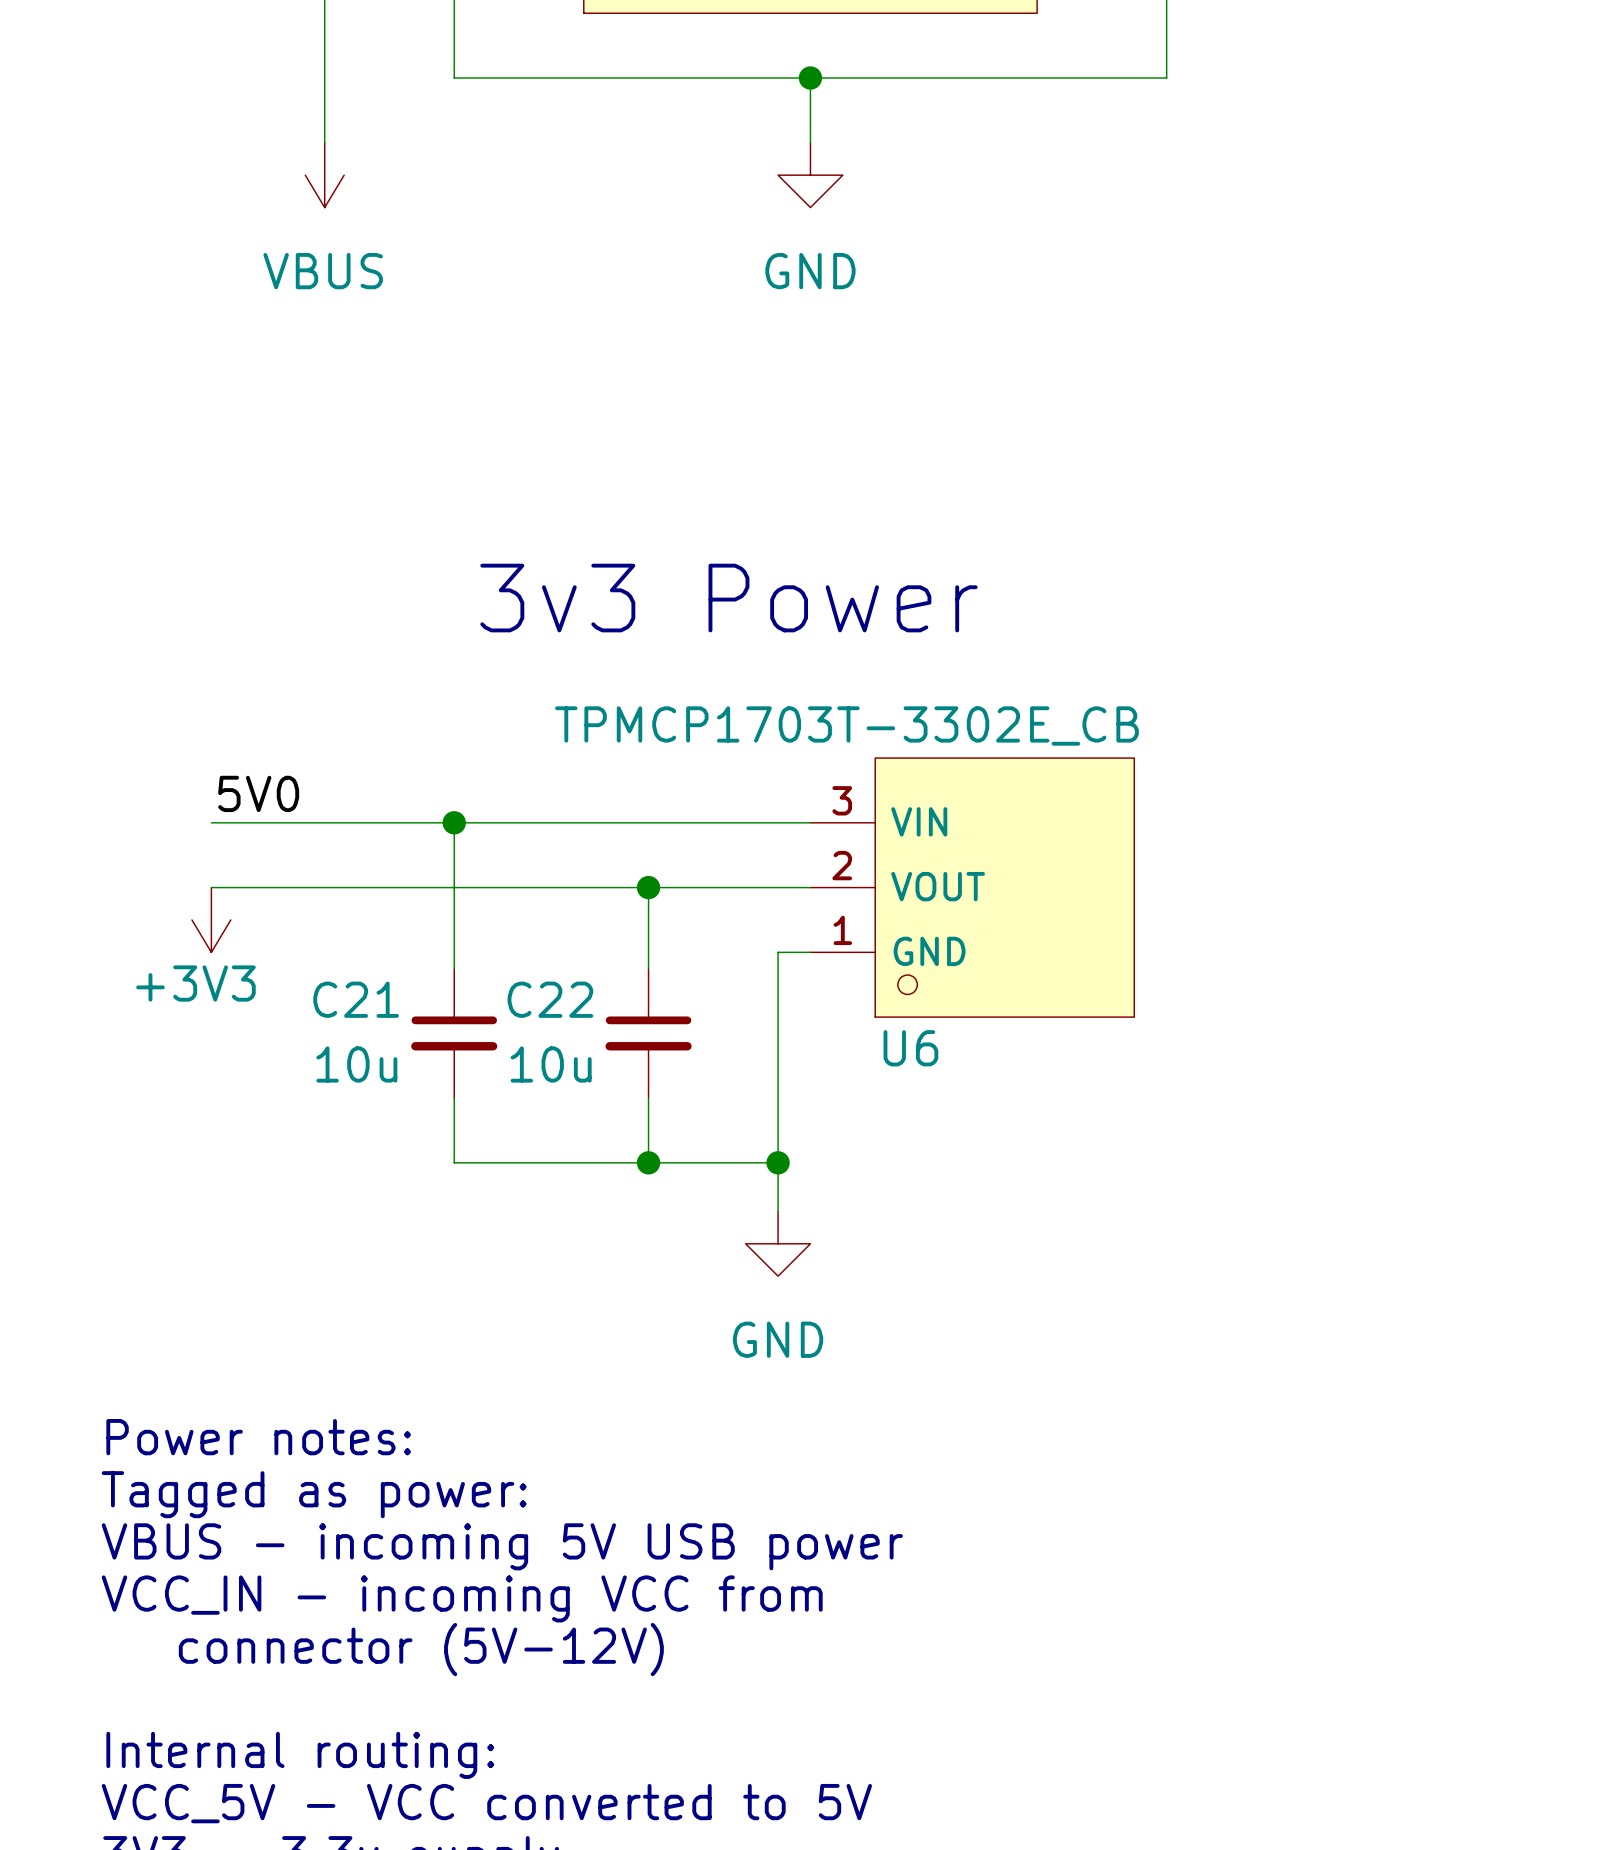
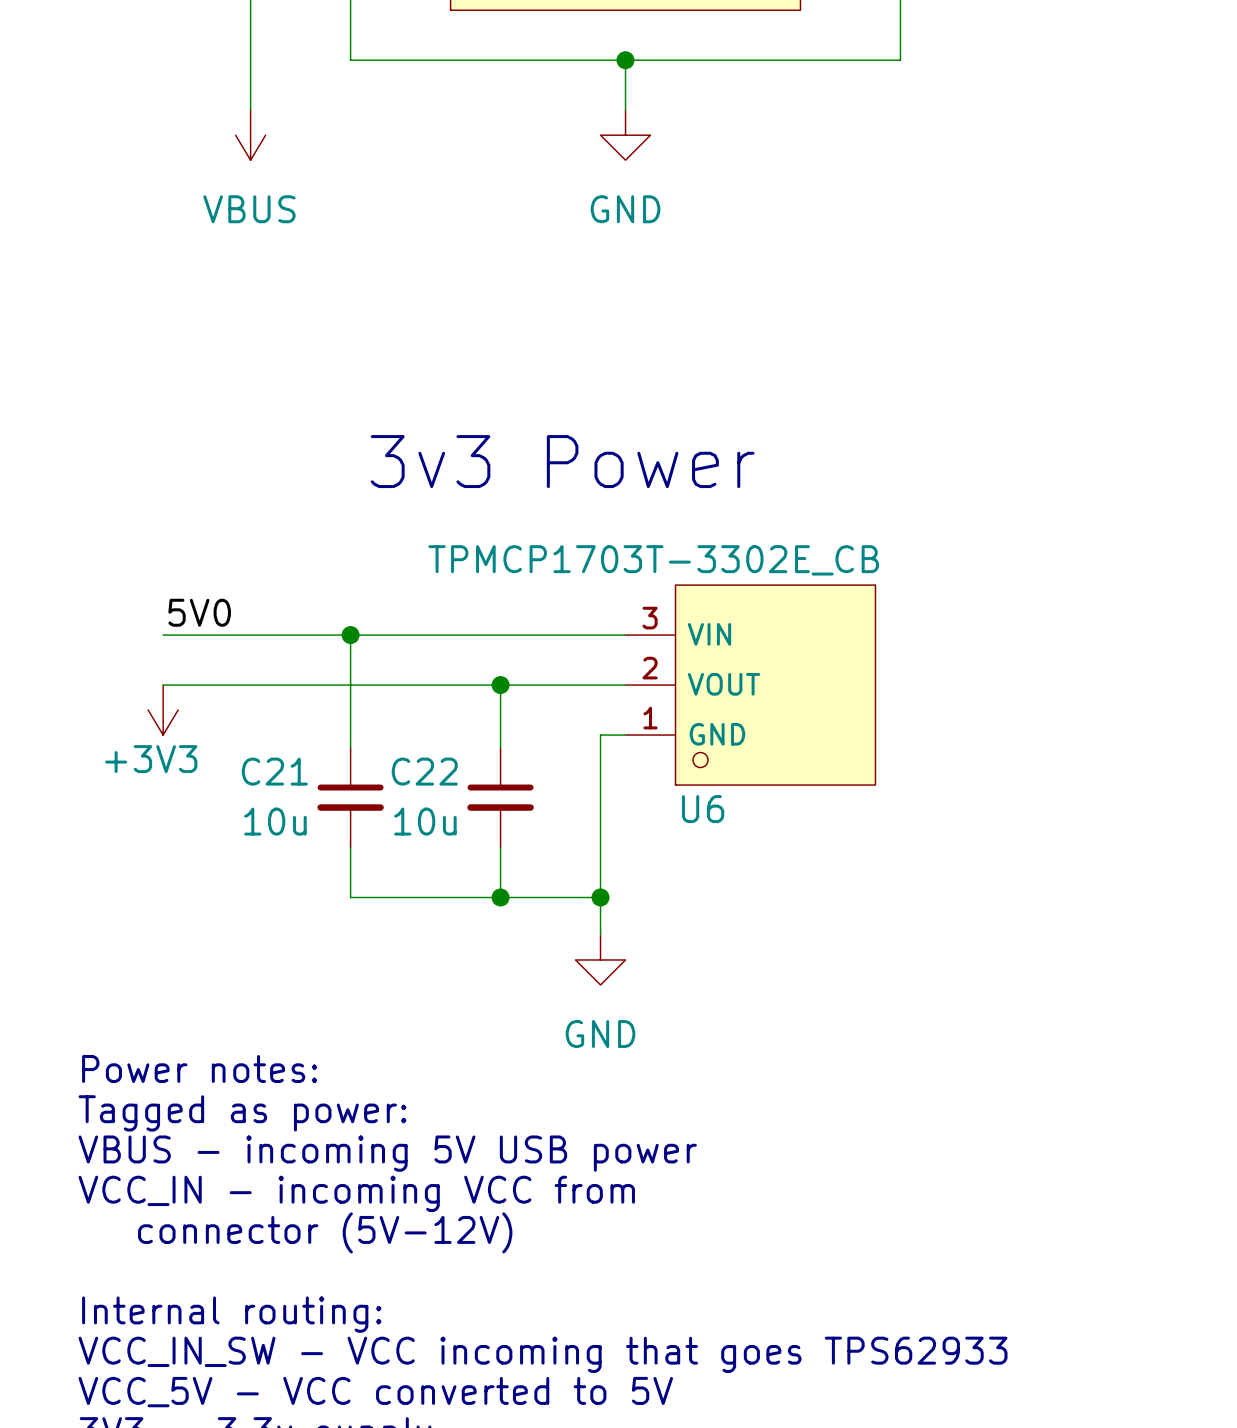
text: none -> Power notes: (199, 1068)
text: Power notes: (258, 1437) -> Tagged as power: (242, 1113)
text: Tagged as power: (314, 1494) -> VBUS - incoming 5V USB power (387, 1153)
text: VBUS - incoming 5V USB power (502, 1546) -> VCC_IN - incoming VCC from (356, 1193)
text: VCC_IN - incoming VCC from (462, 1598) -> connector (5V-12V) (325, 1232)
text: connector (5V-12V) (421, 1649) -> none
text: none -> Internal routing: (231, 1314)
text: Internal routing: (300, 1755) -> VCC_IN_SW - VCC incoming that goes TPS62933 (543, 1354)

